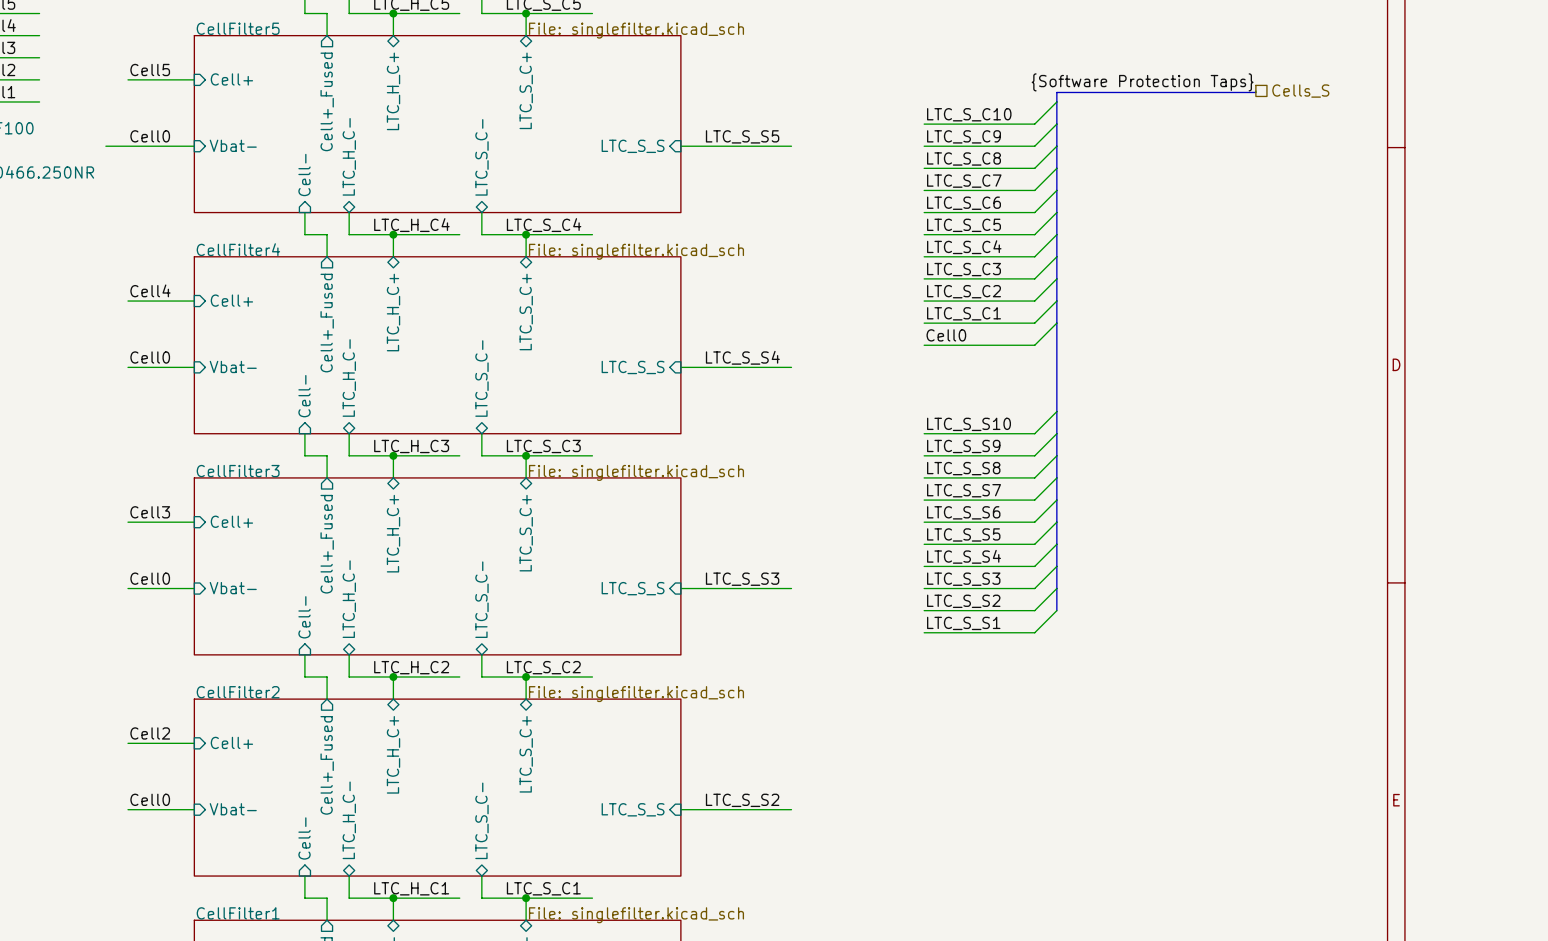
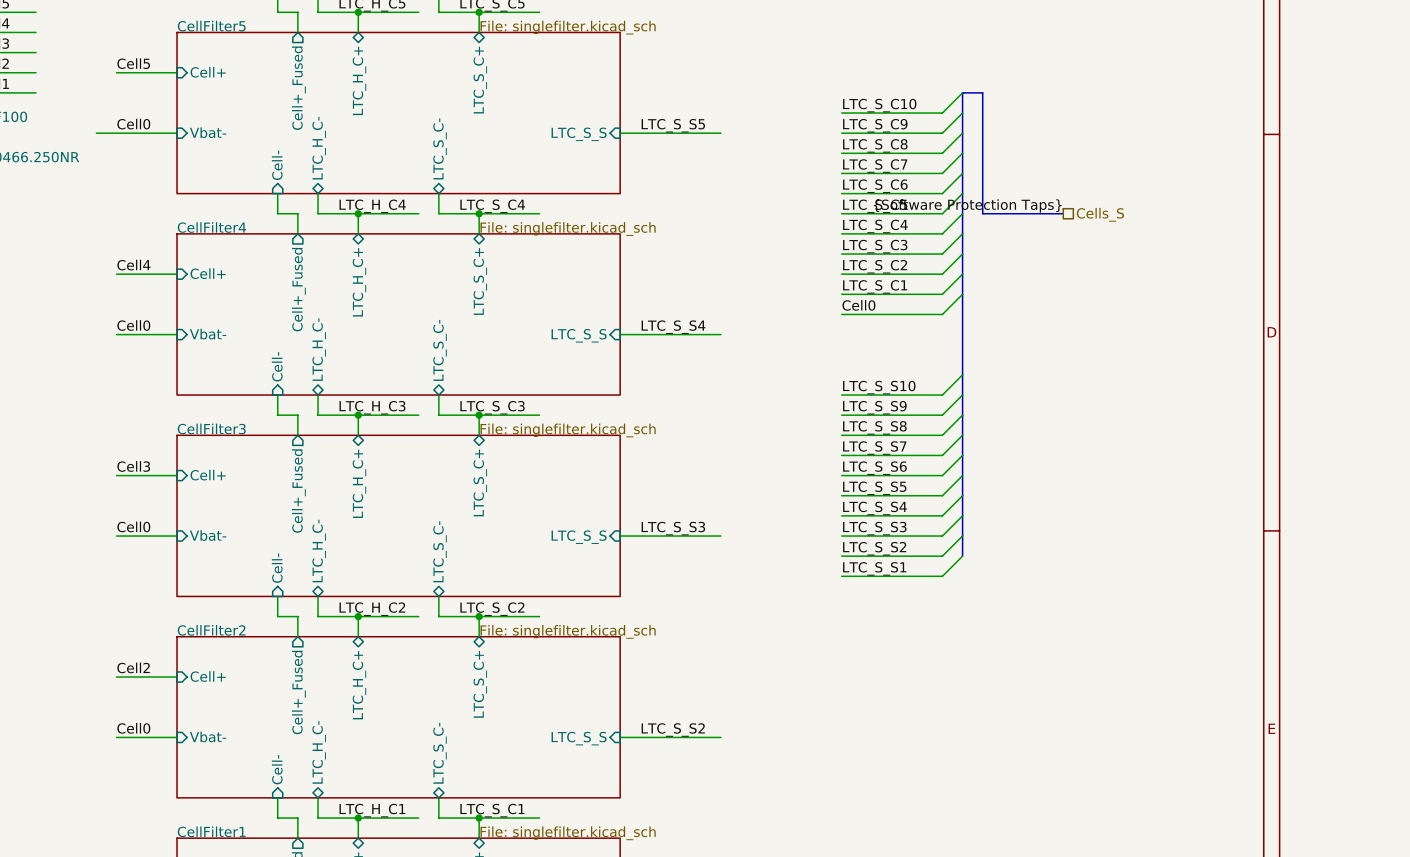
label position: {Software Protection Taps} (1142, 82) -> {Software Protection Taps} (967, 205)
wire: (1255, 90) (1255, 92) -> none
hierarchical label position: Cells_S (1300, 91) -> Cells_S (1100, 214)
bus: (1255, 92) (1056, 92) (1056, 101) -> (1063, 213) (982, 213) (982, 92) (962, 92)

